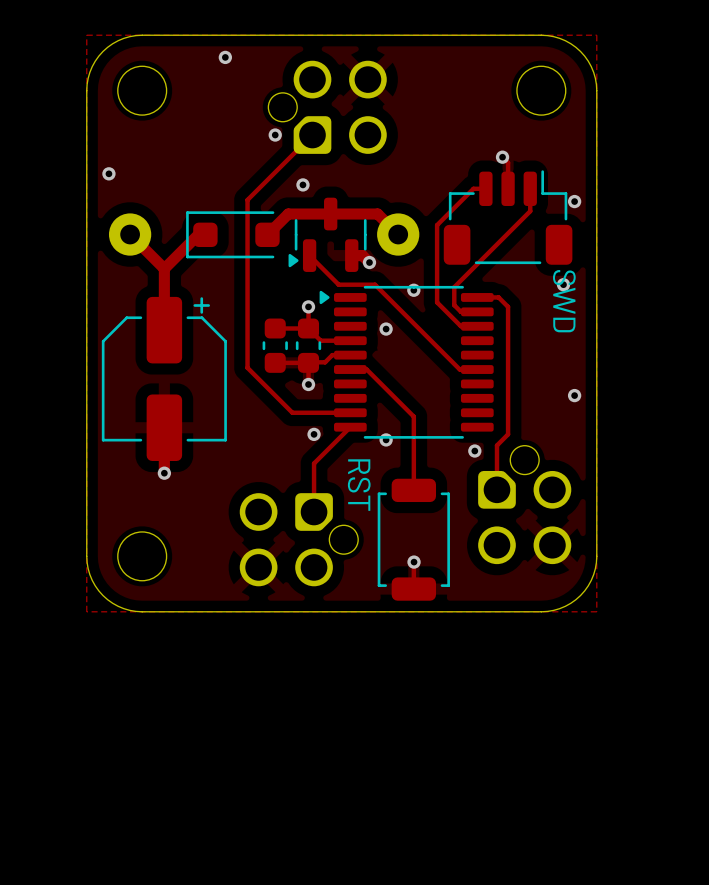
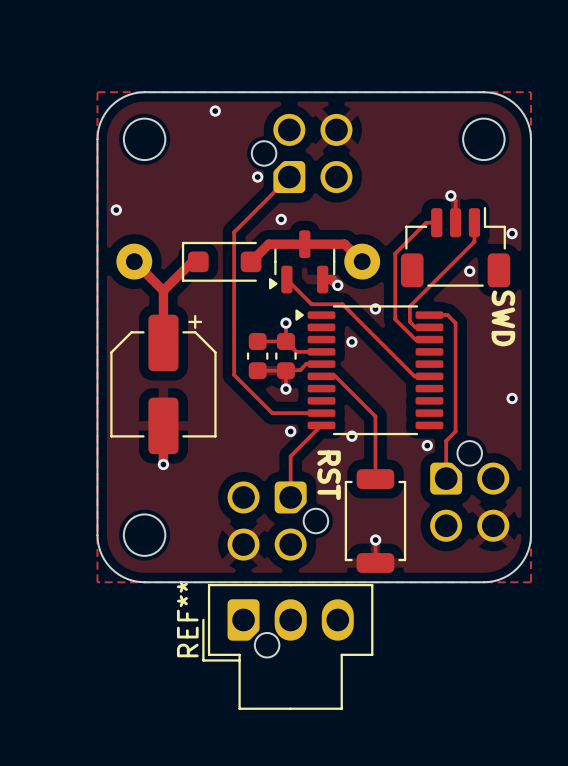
via position: (563, 284) -> (469, 271)
REF**: none -> (287, 646)

